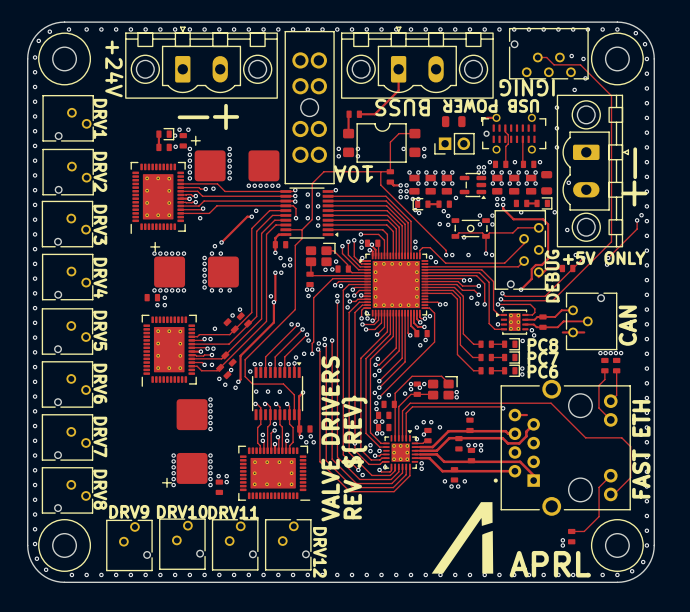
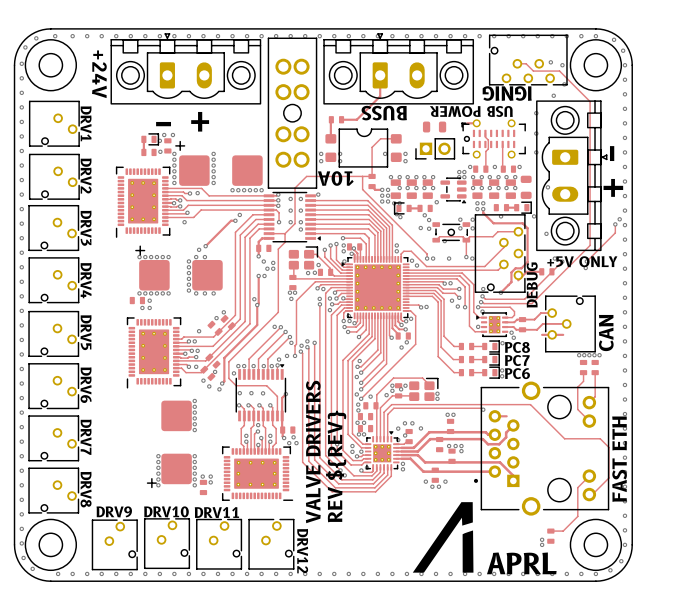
via: none -> (483, 289)

